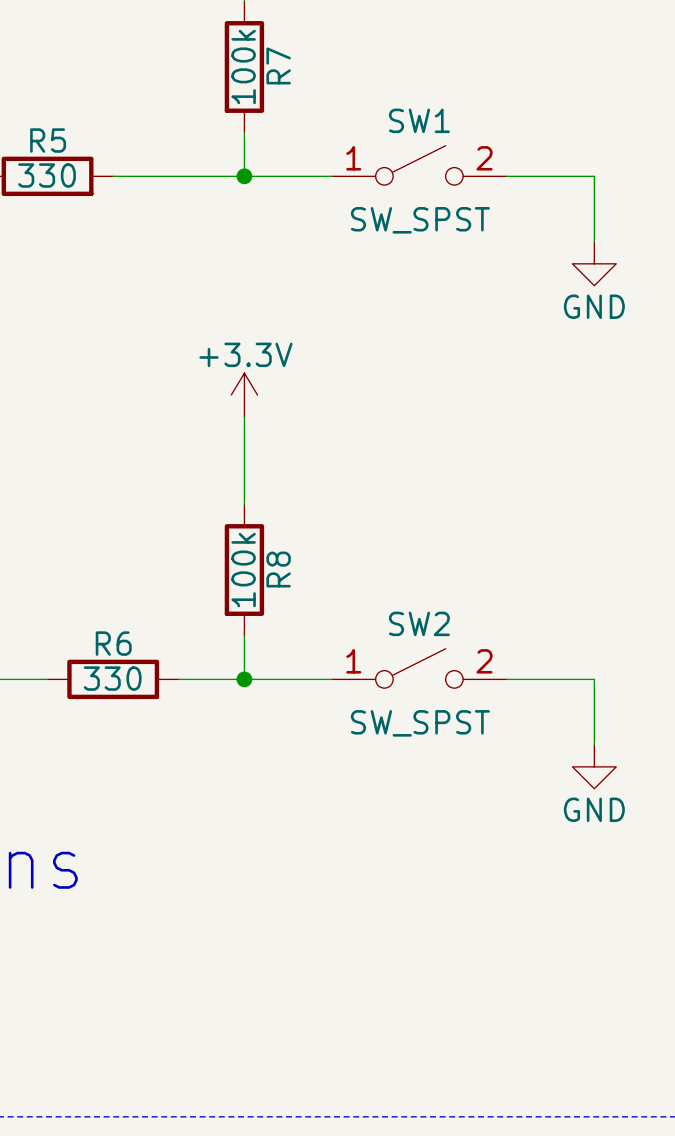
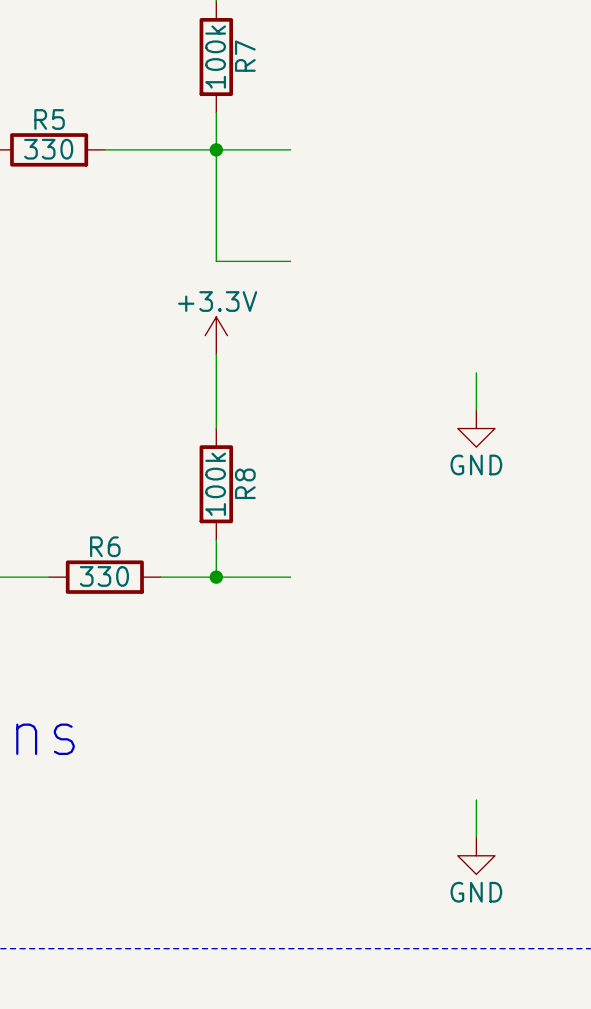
SW1: SW_SPST (419, 165) -> none
wire: none -> (216, 149) (216, 261) (290, 261)
wire: (506, 176) (594, 176) (594, 241) -> none
power symbol: GND (594, 263) -> none
wire: none -> (476, 372) (476, 409)
power symbol: none -> GND (476, 428)
SW2: SW_SPST (419, 668) -> none
wire: (506, 679) (594, 679) (594, 745) -> none
power symbol: GND (594, 766) -> none
wire: none -> (476, 800) (476, 837)
power symbol: none -> GND (476, 855)

